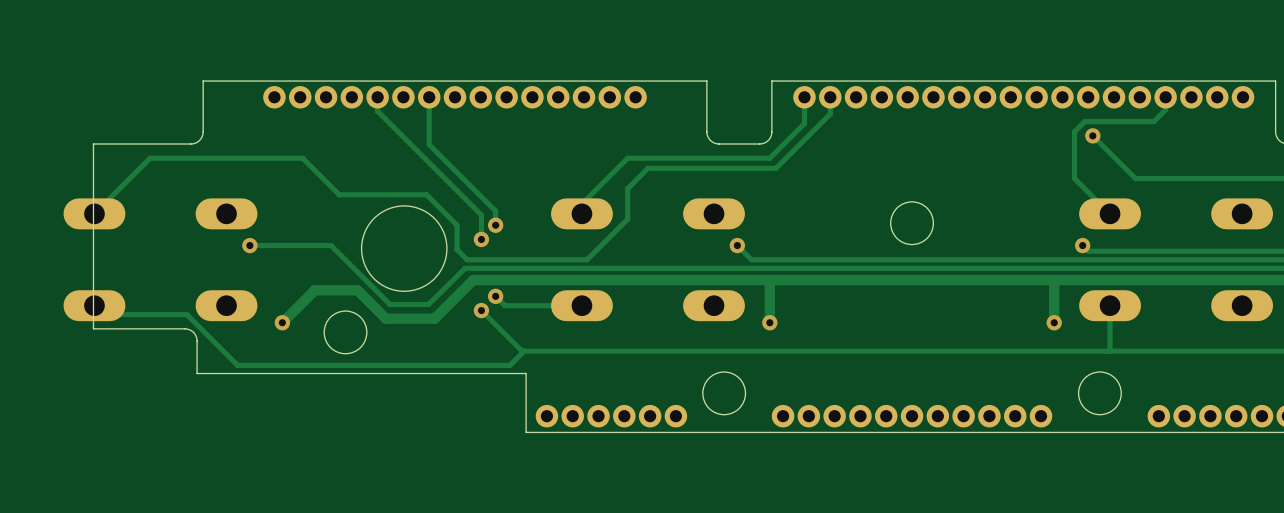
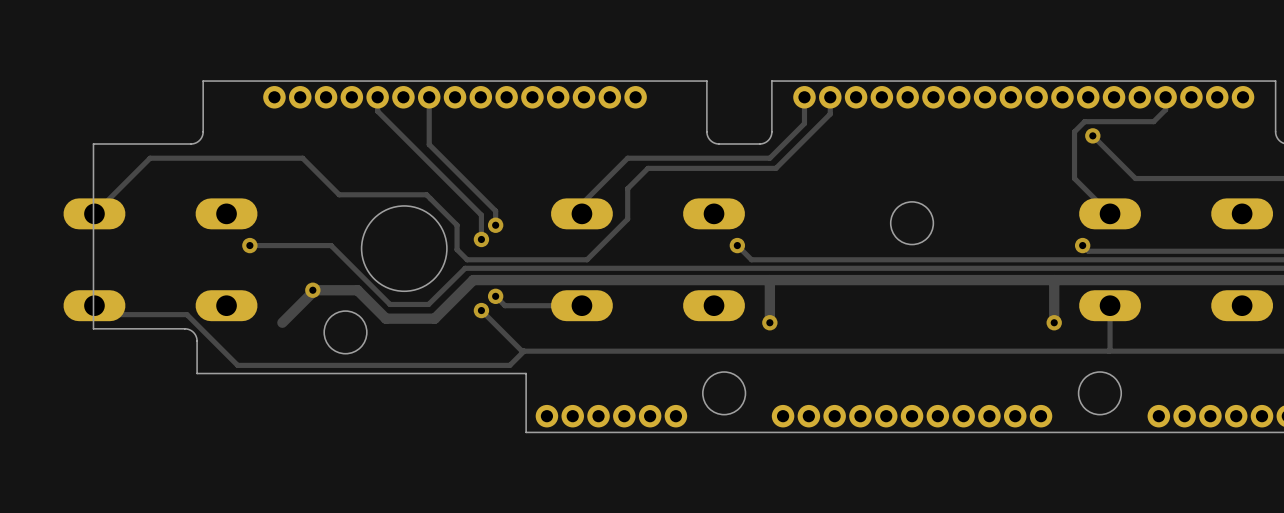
via position: (282, 322) -> (312, 290)

